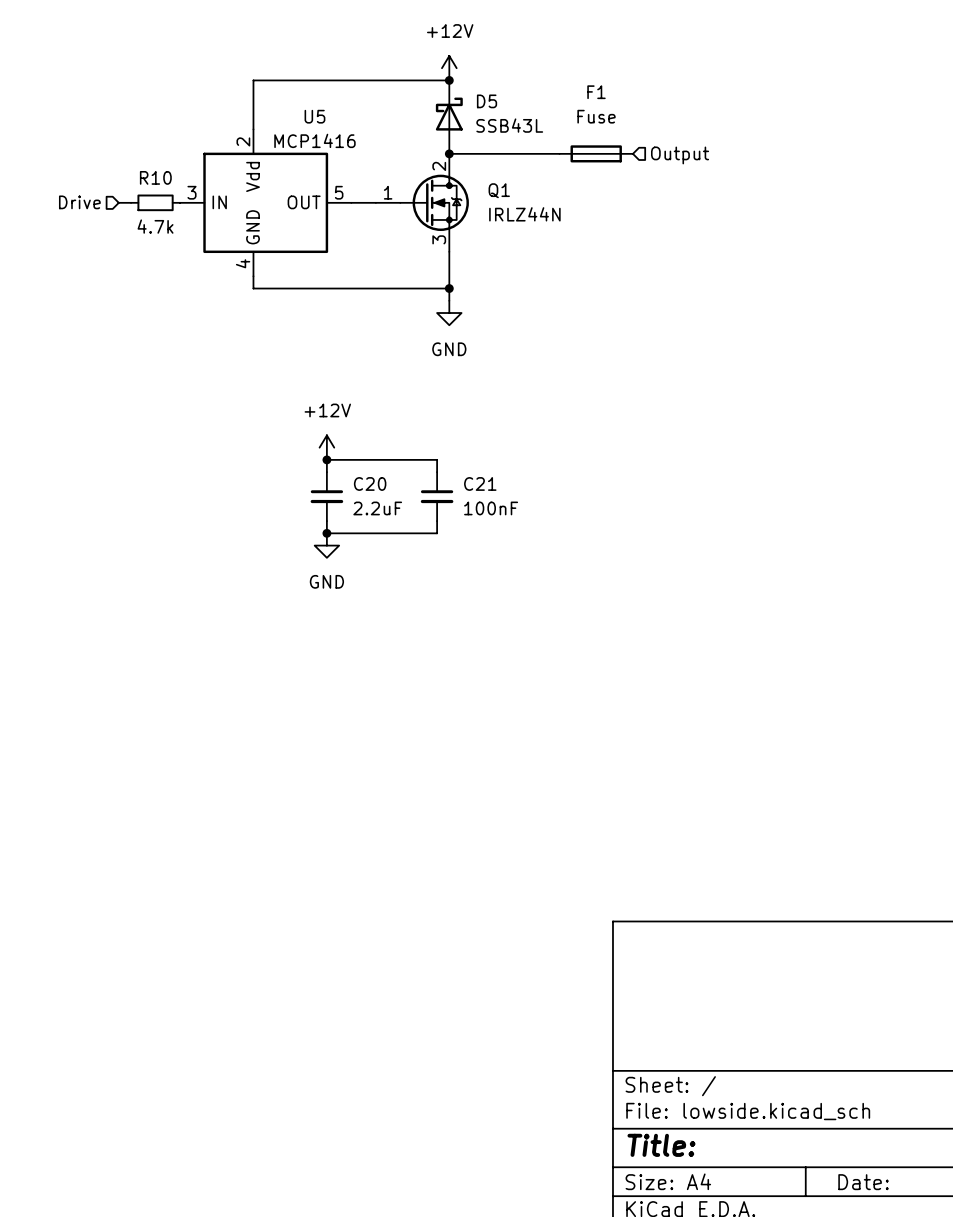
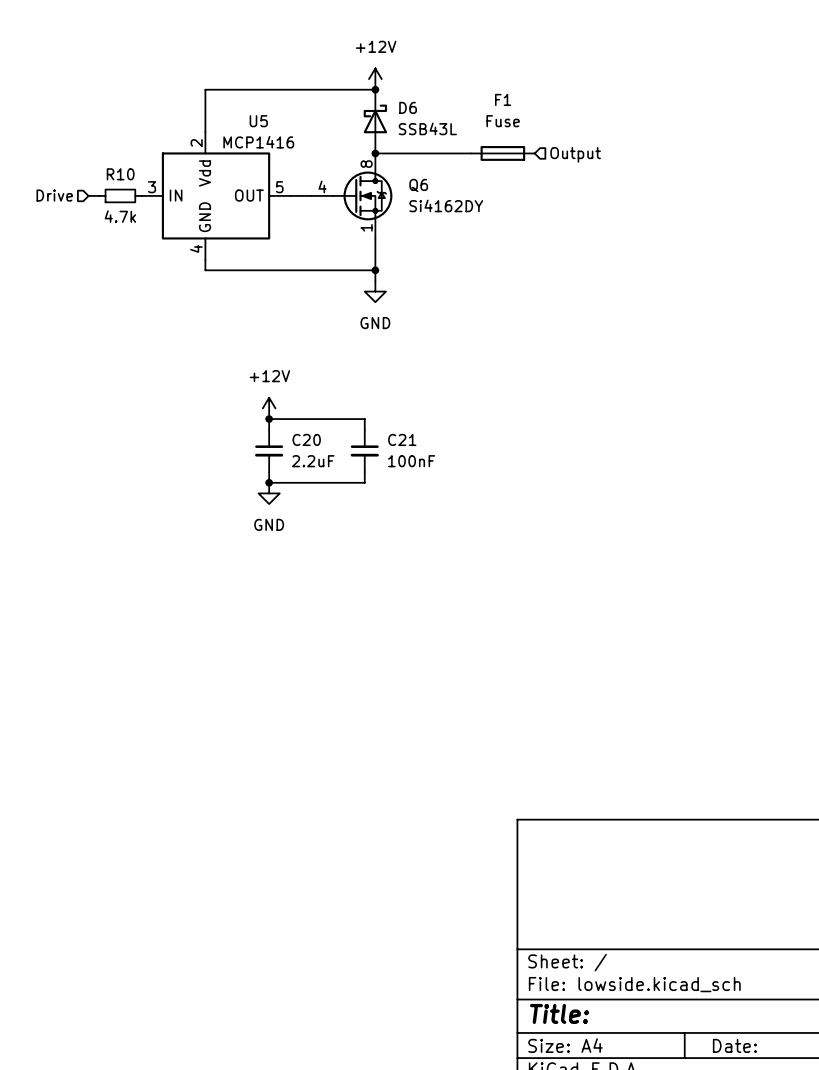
D5 name: D5 (487, 101) -> D6 (408, 107)
Q1 pin number: 2 (439, 166) -> 8 (366, 164)
Q1 name: Q1 (499, 190) -> Q6 (418, 185)
Q1 pin number: 1 (388, 192) -> 4 (322, 186)
Q1 value: IRLZ44N (524, 214) -> Si4162DY (446, 205)
Q1 pin number: 3 (439, 239) -> 1 (366, 227)

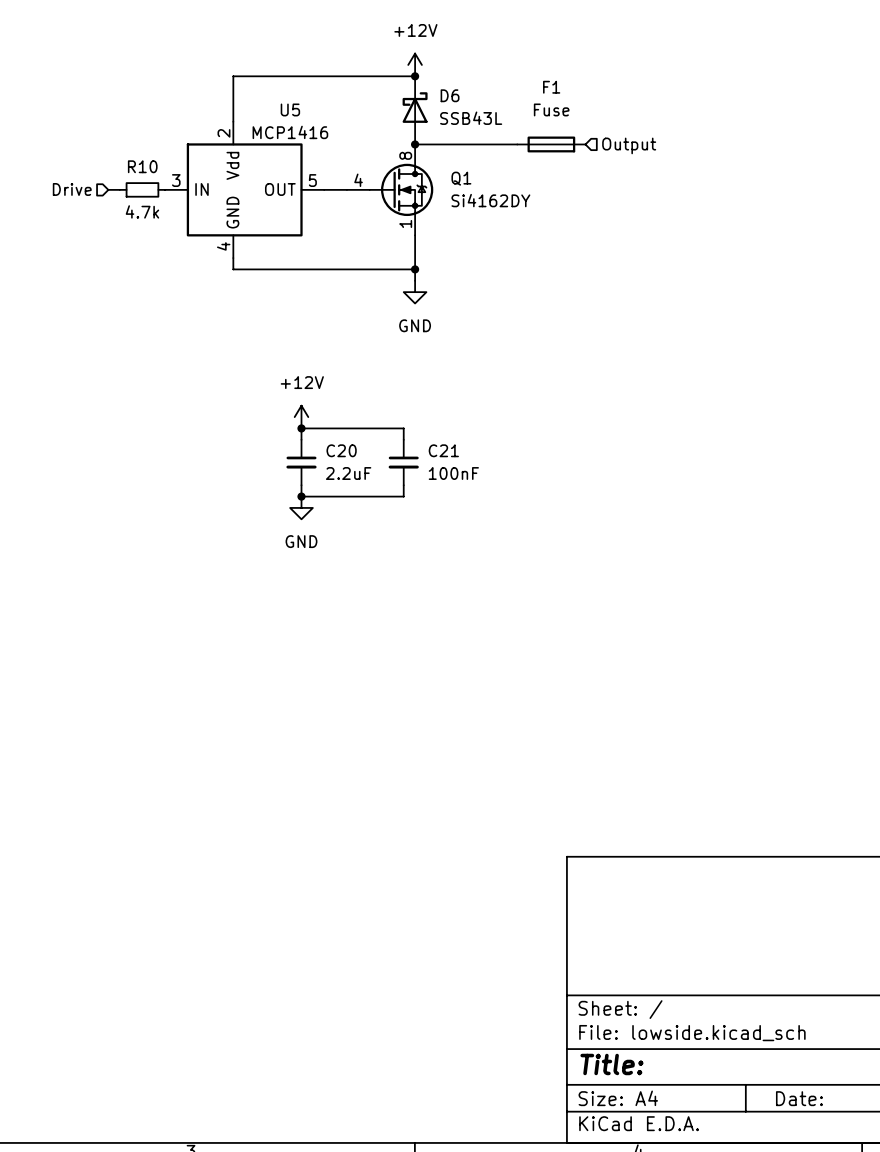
Q6 name: Q6 (418, 185) -> Q1 (461, 178)

